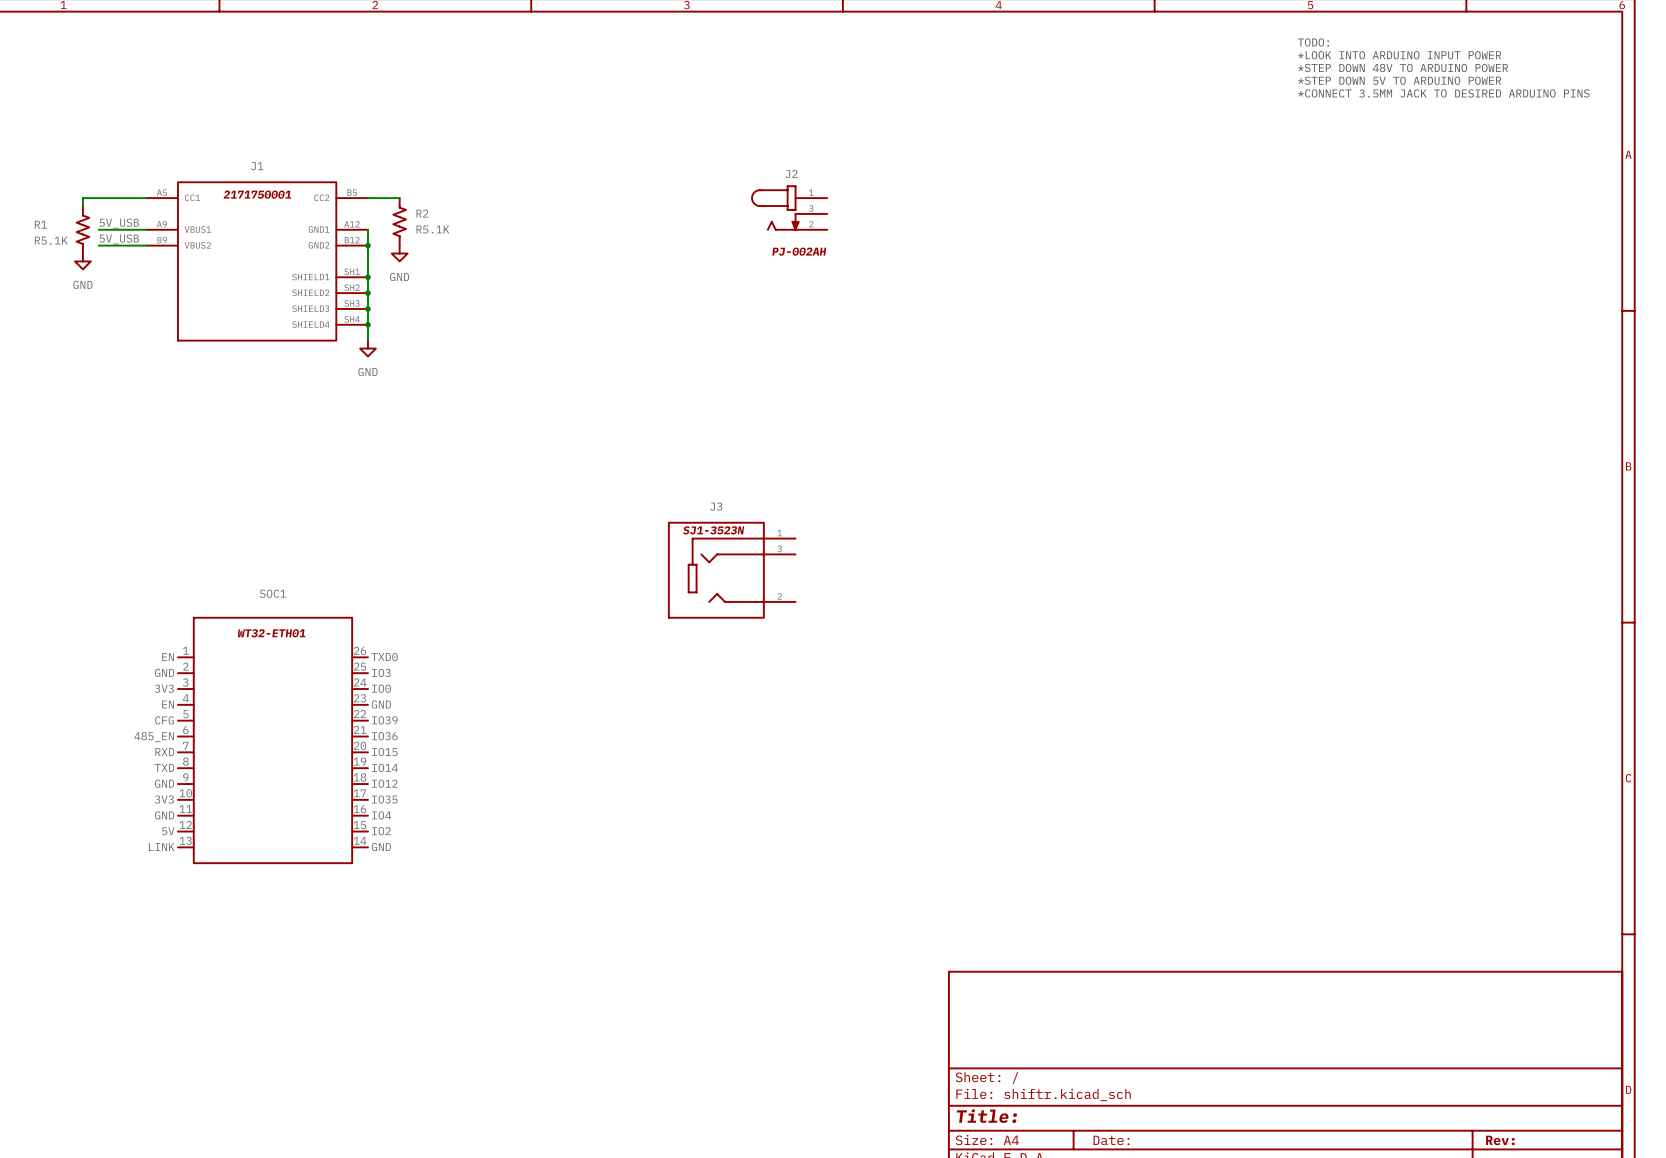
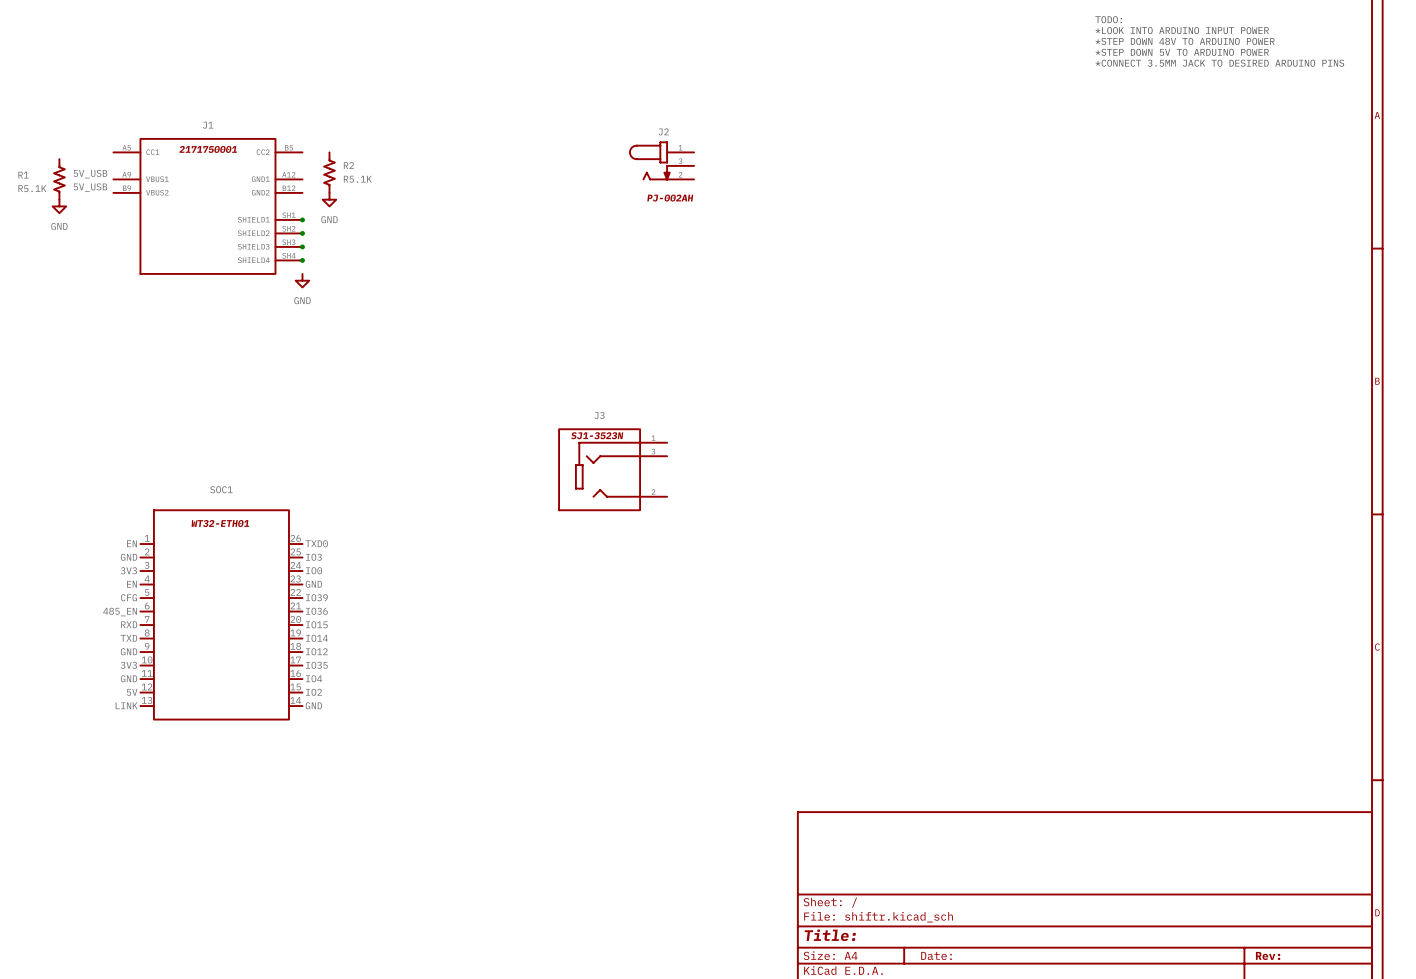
wire: (146, 198) (82, 198) (82, 206) -> none
wire: (367, 198) (399, 198) -> none
wire: (98, 229) (146, 229) -> none
wire: (367, 229) (367, 340) -> none
wire: (98, 245) (146, 245) -> none
junction: (367, 245) -> none

